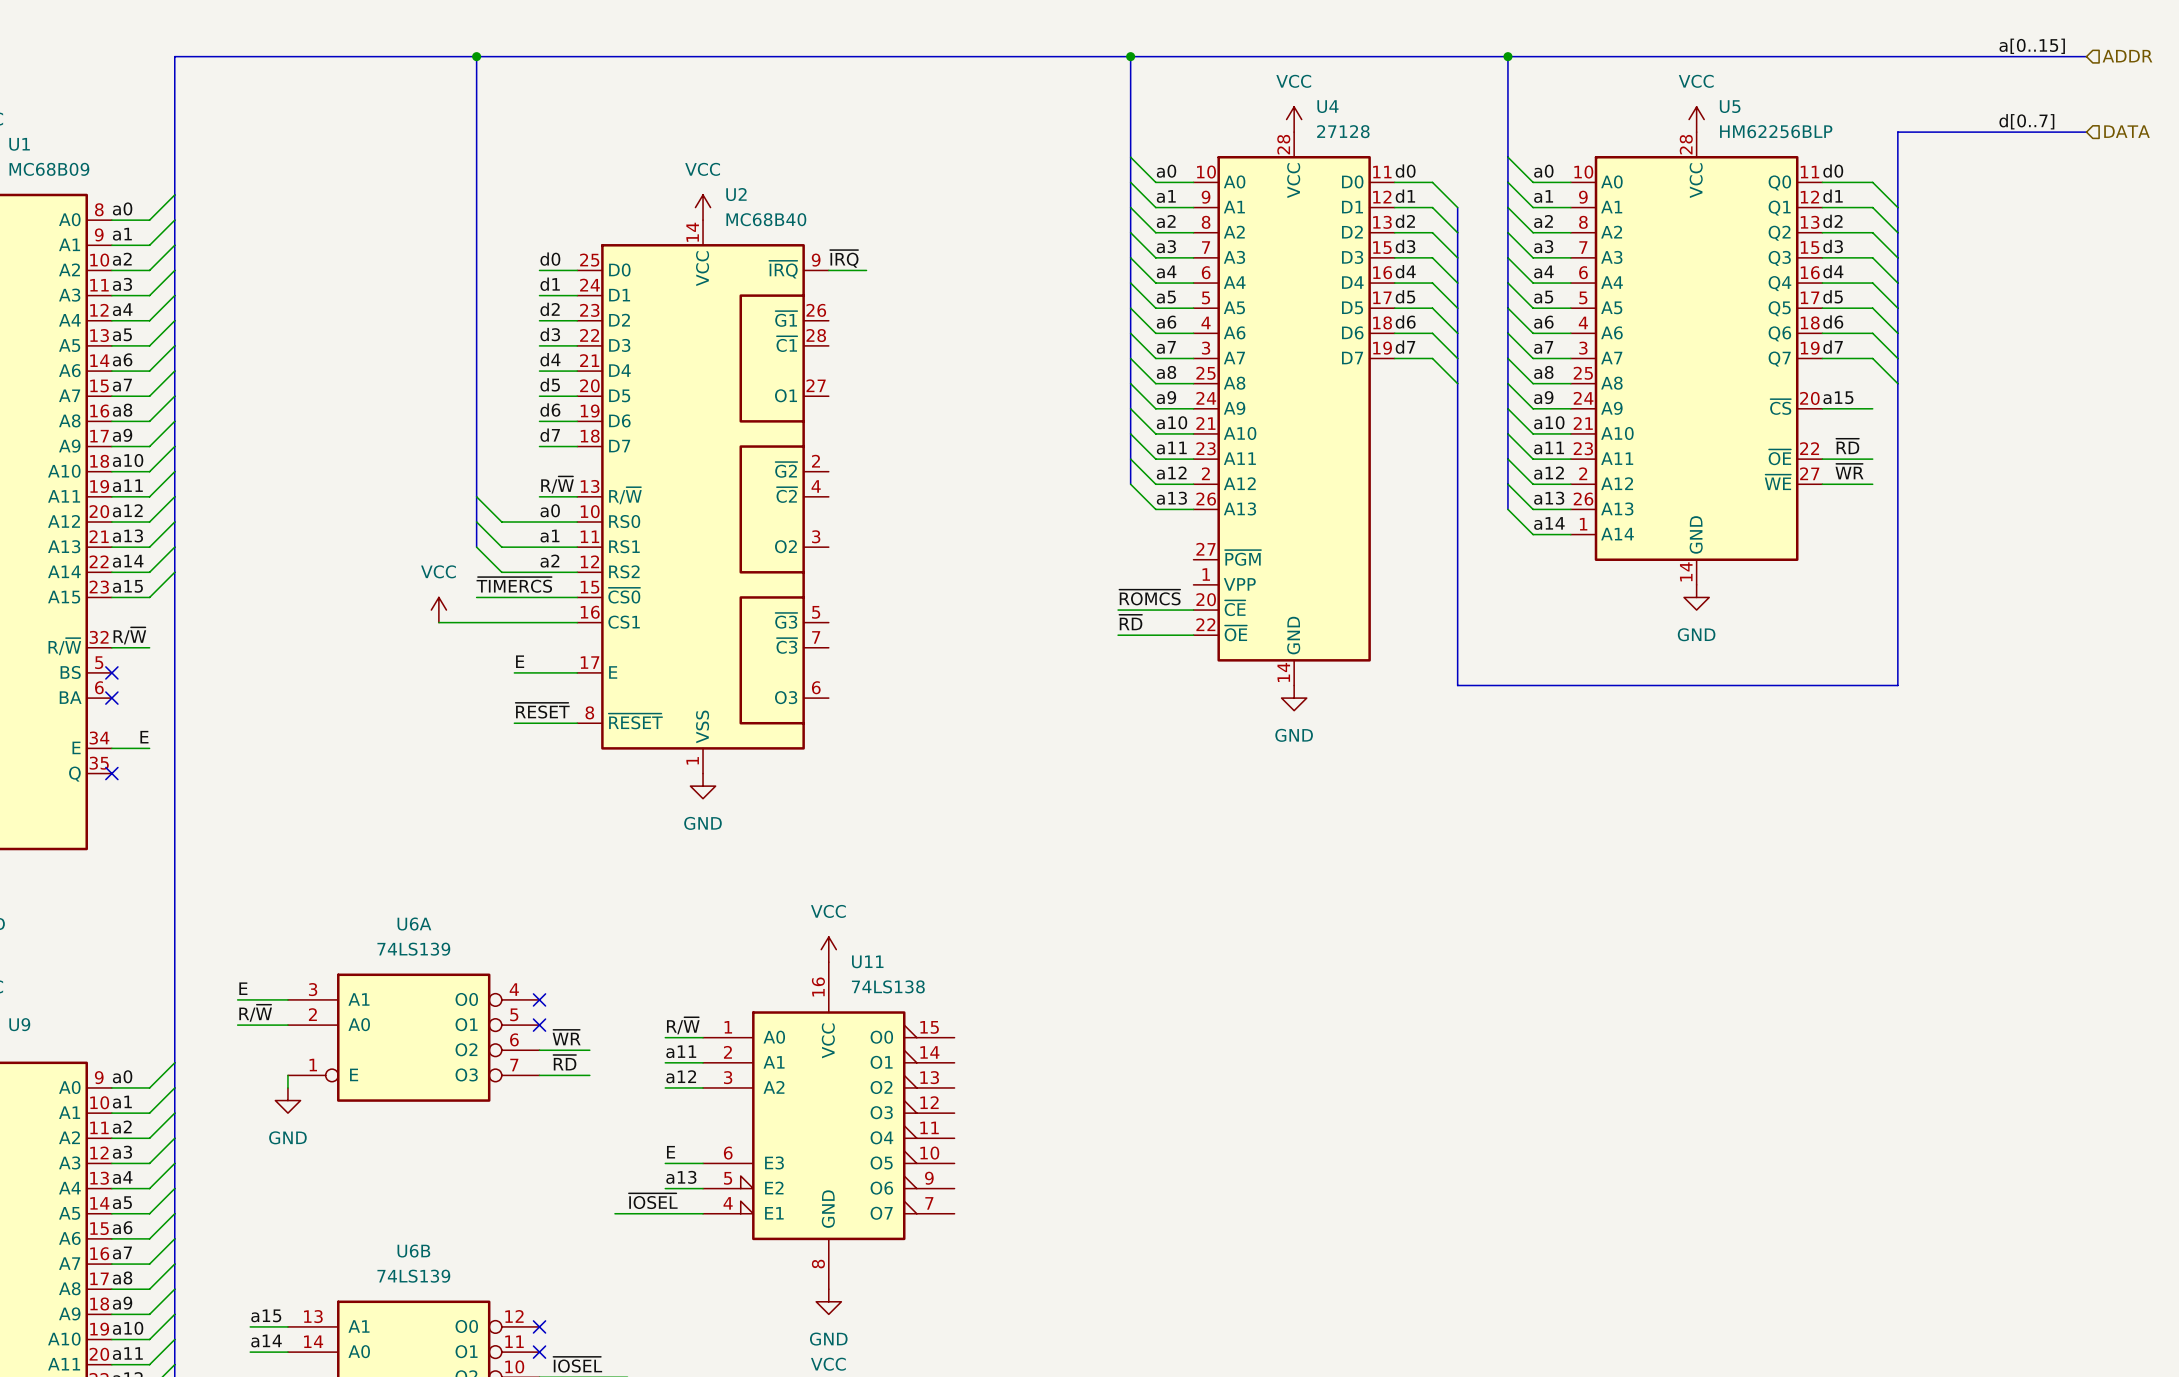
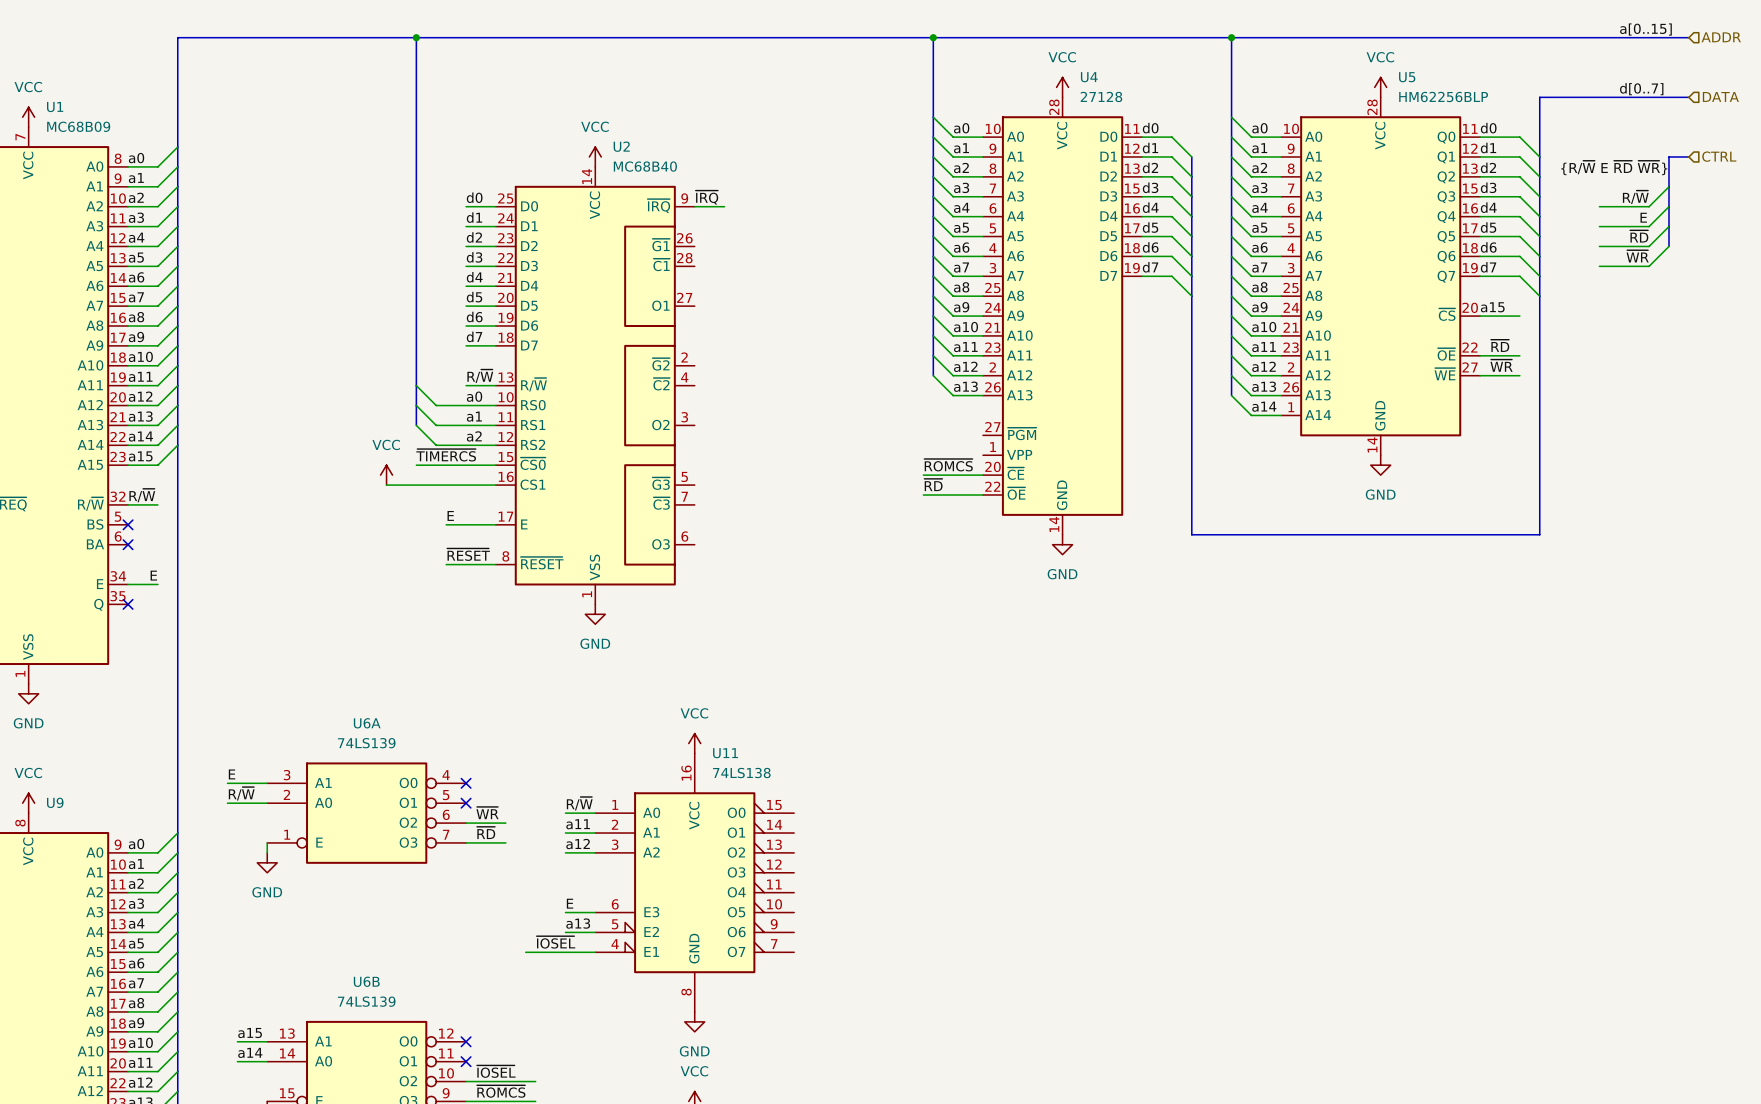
bus: none -> (1688, 156) (1668, 156) (1668, 246)
hierarchical label: none -> CTRL (1719, 156)
label: none -> {R/~{W} E ~{RD} ~{WR}} (1614, 167)
wire: none -> (1668, 186) (1649, 206) (1599, 206)
label: none -> R/~{W} (1635, 197)
wire: none -> (1668, 206) (1649, 226) (1599, 226)
label: none -> E (1643, 217)
wire: none -> (1668, 226) (1649, 246) (1599, 246)
label: none -> ~{RD} (1639, 236)
wire: none -> (1668, 246) (1649, 266) (1599, 266)
label: none -> ~{WR} (1637, 256)

